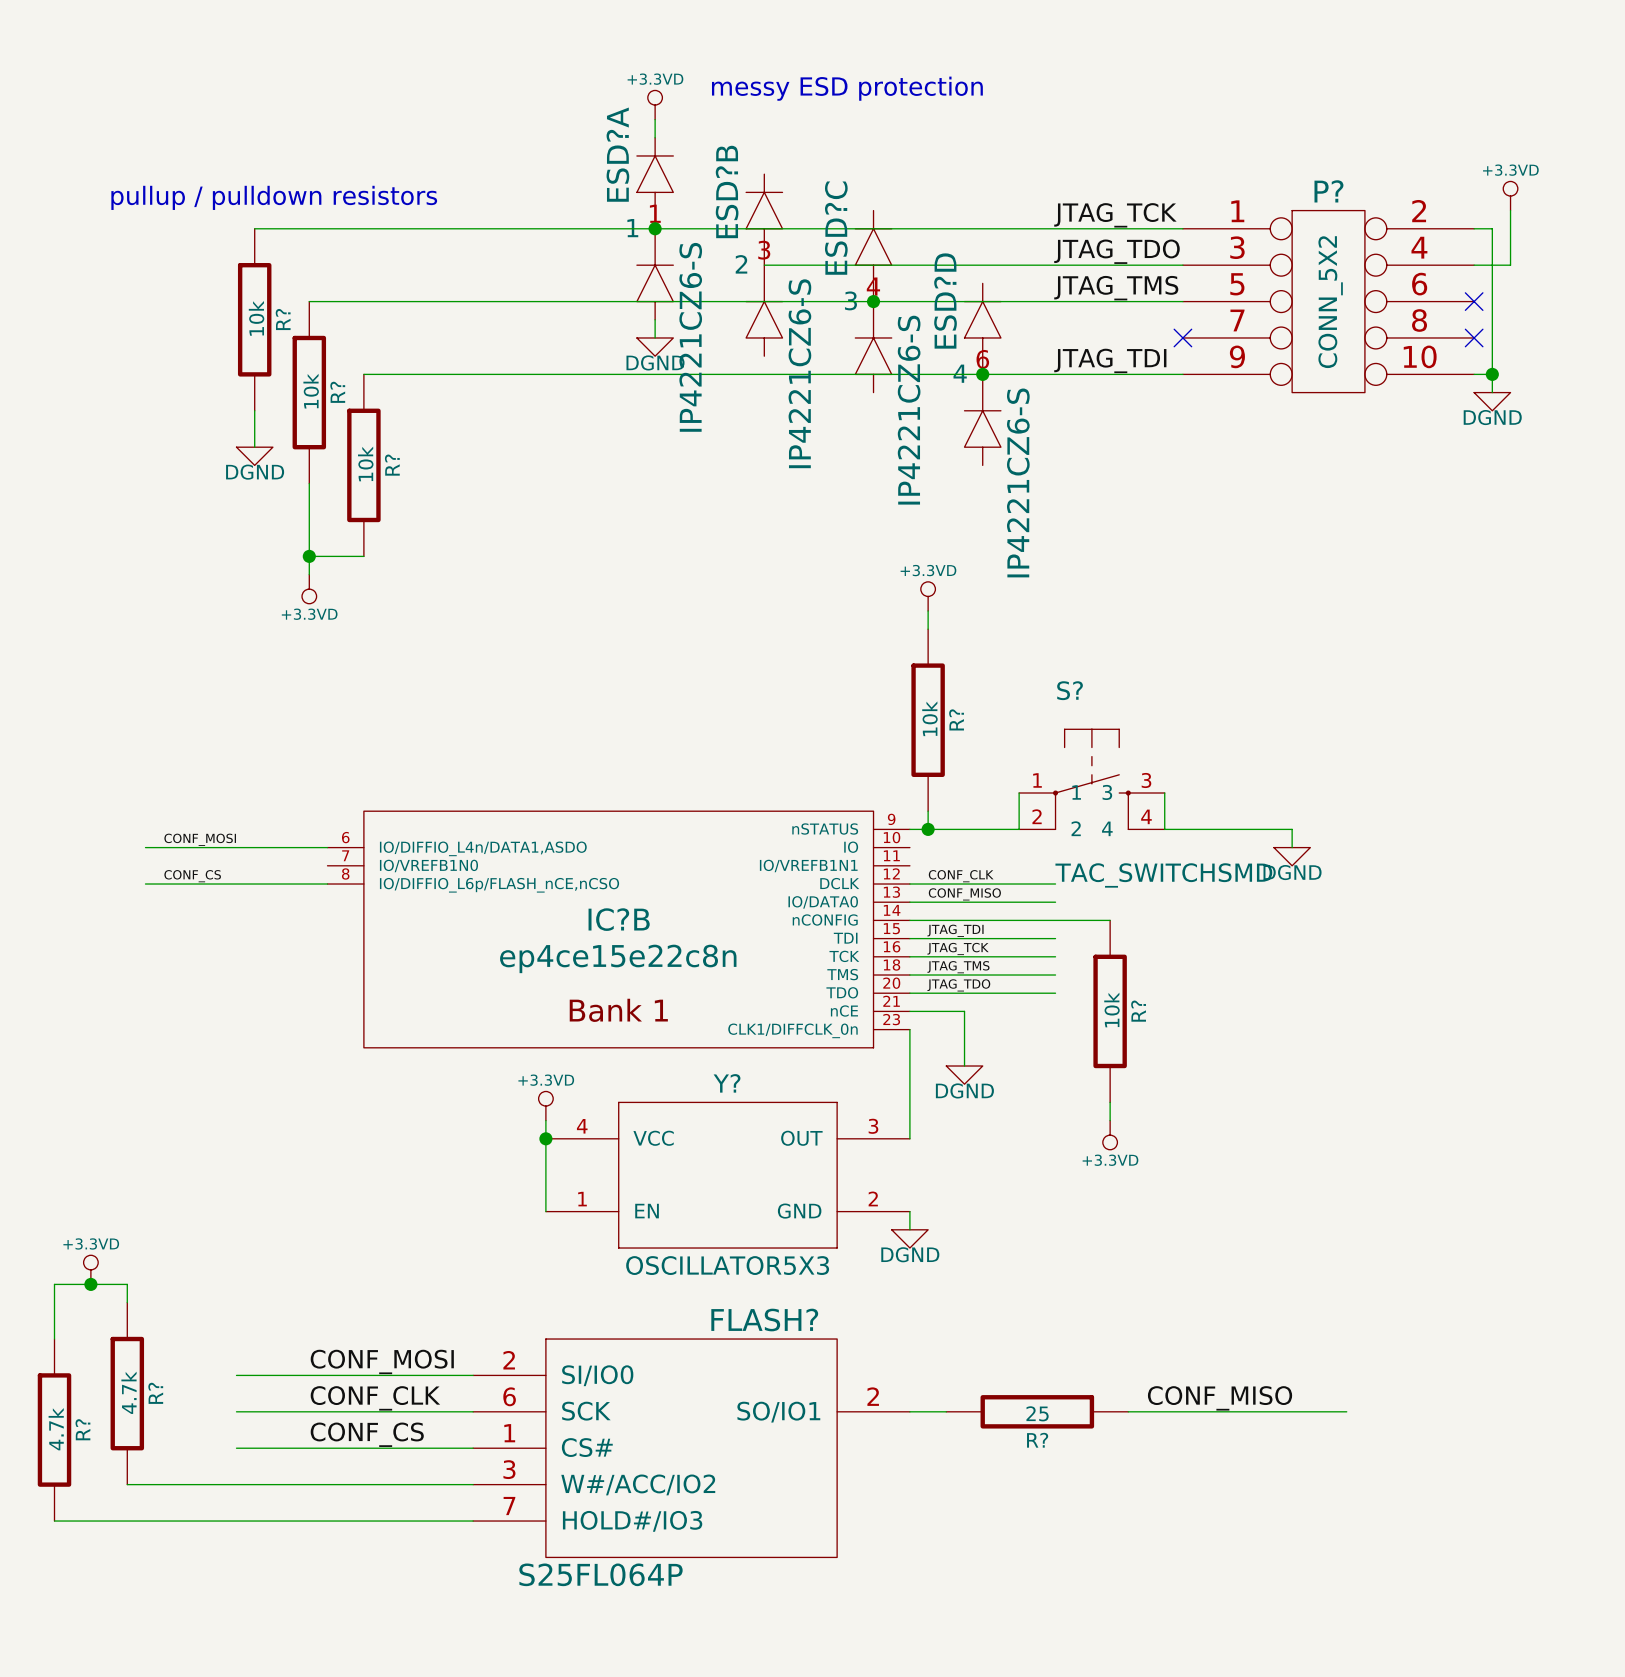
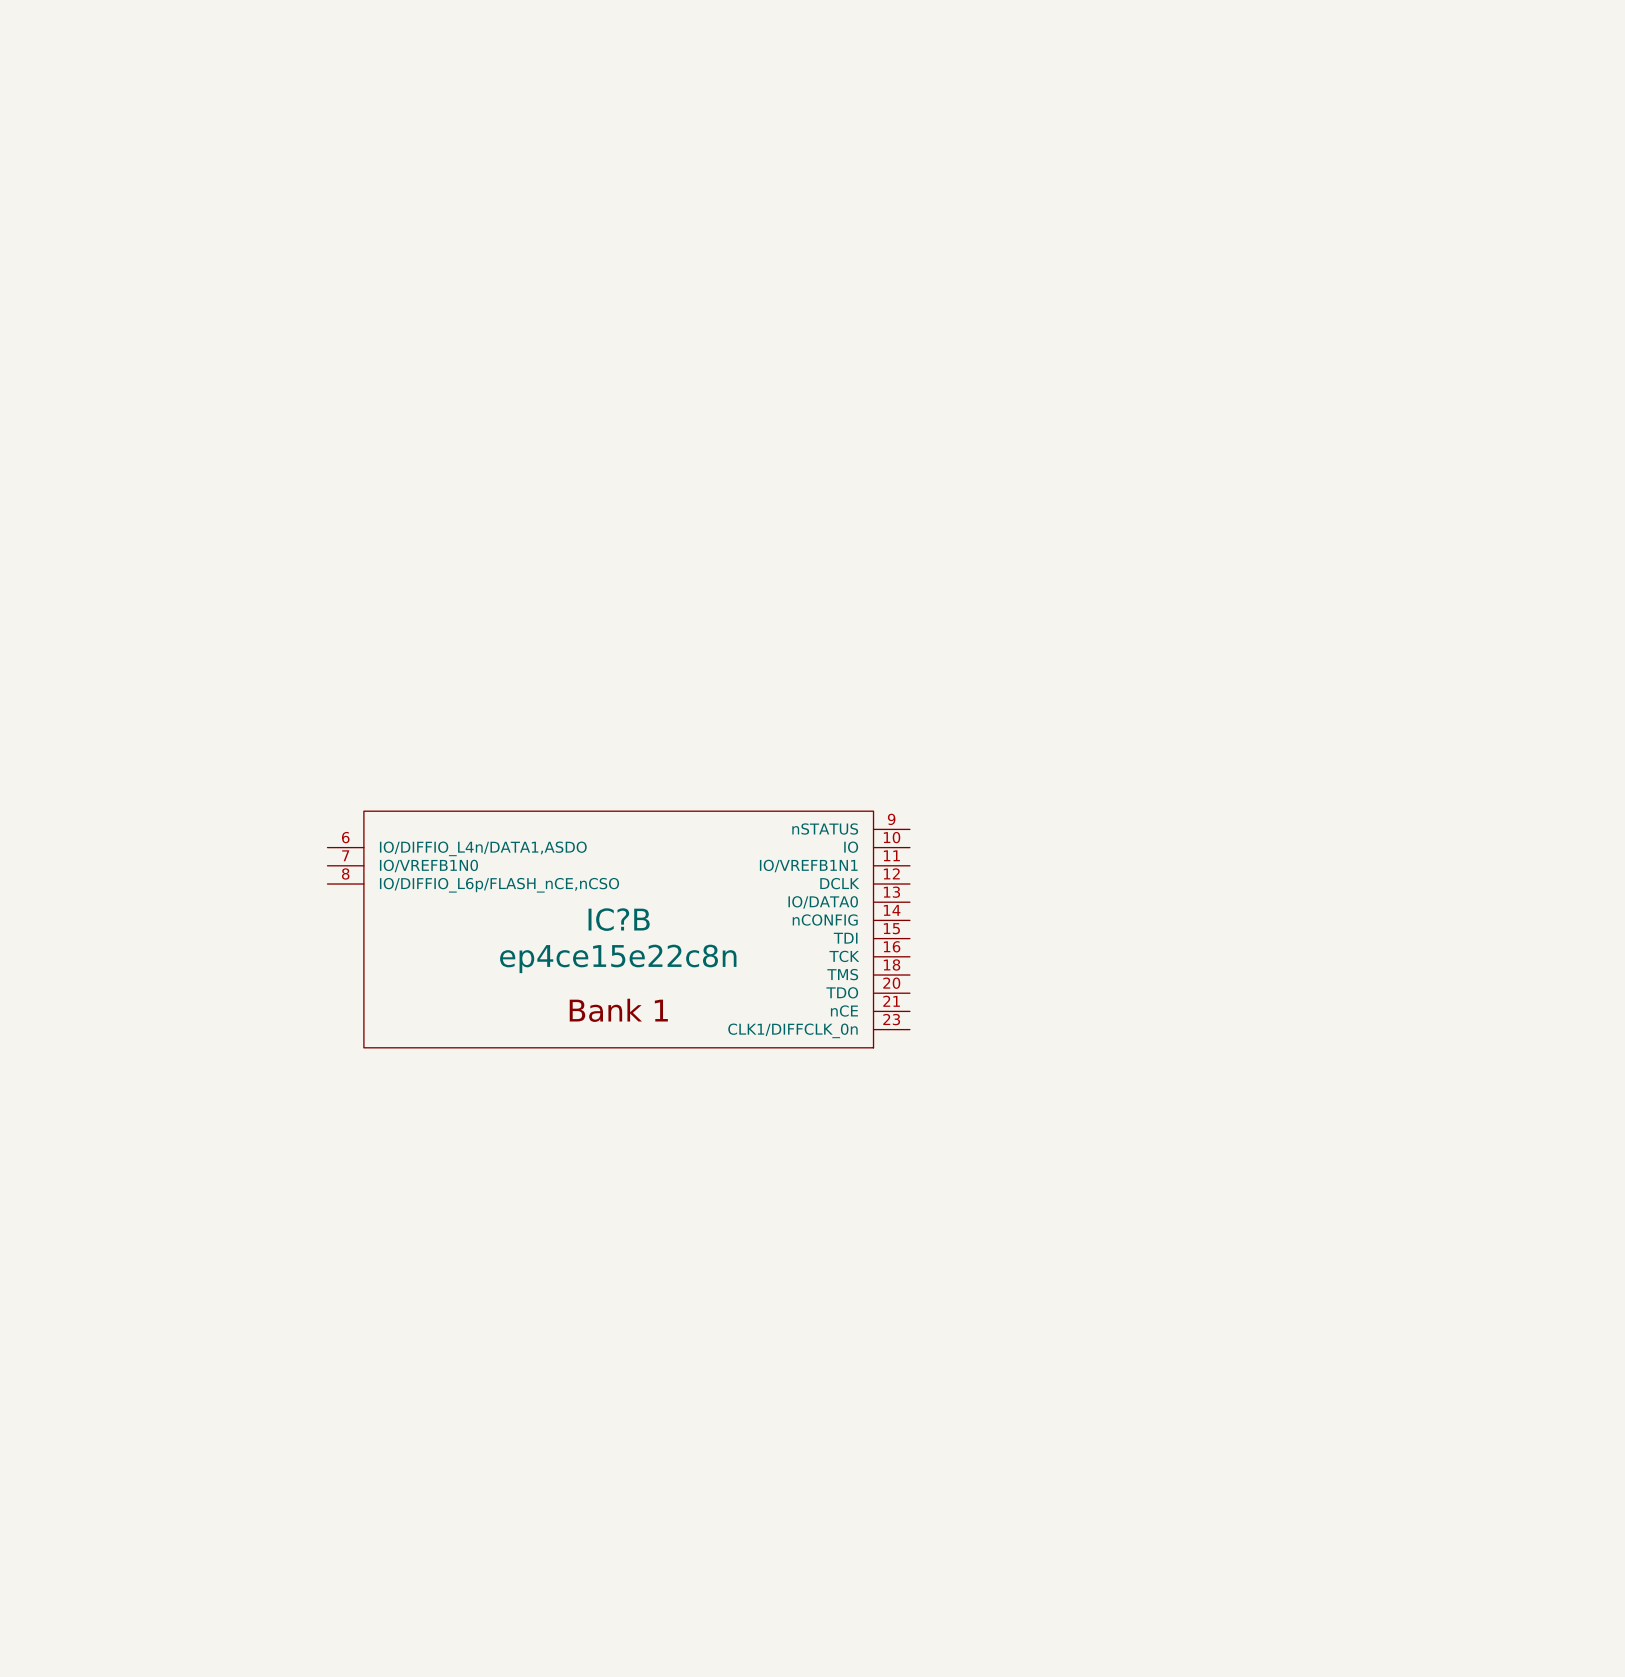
text: messy ESD protection (847, 88) -> none
power symbol: +3.3VD (655, 105) -> none
wire: (655, 119) (655, 137) -> none
power symbol: +3.3VD (1510, 196) -> none
text: pullup / pulldown resistors (274, 197) -> none
wire: (1510, 210) (1510, 265) (1474, 265) -> none
label: JTAG_TCK (1115, 215) -> none
wire: (254, 228) (1182, 228) -> none
ESD?A: IP4221CZ6-S (655, 228) -> none
junction: (655, 228) -> none
wire: (1474, 228) (1492, 228) (1492, 392) -> none
label: JTAG_TDO (1116, 251) -> none
wire: (764, 265) (1182, 265) -> none
ESD?B: IP4221CZ6-S (764, 265) -> none
label: JTAG_TMS (1116, 288) -> none
wire: (309, 301) (1182, 301) -> none
ESD?C: IP4221CZ6-S (873, 301) -> none
junction: (873, 301) -> none
P?: CONN_5X2 (1328, 301) -> none
no-connect mark: (1474, 301) -> none
R?: 10k (254, 319) -> none
wire: (655, 319) (655, 337) -> none
no-connect mark: (1182, 337) -> none
no-connect mark: (1474, 337) -> none
power symbol: DGND (655, 347) -> none
label: JTAG_TDI (1110, 360) -> none
wire: (363, 374) (1182, 374) -> none
ESD?D: IP4221CZ6-S (982, 374) -> none
junction: (982, 374) -> none
wire: (1474, 374) (1492, 374) -> none
junction: (1492, 374) -> none
R?: 10k (309, 392) -> none
power symbol: DGND (1492, 401) -> none
wire: (254, 410) (254, 447) -> none
power symbol: DGND (254, 456) -> none
R?: 10k (363, 465) -> none
wire: (309, 483) (309, 574) -> none
wire: (309, 556) (363, 556) -> none
junction: (309, 556) -> none
power symbol: +3.3VD (309, 589) -> none
power symbol: +3.3VD (928, 596) -> none
wire: (928, 610) (928, 629) -> none
R?: 10k (928, 720) -> none
S?: TAC_SWITCHSMD (1091, 779) -> none
wire: (1019, 793) (1019, 829) (909, 829) -> none
wire: (1164, 793) (1164, 829) (1292, 829) (1292, 847) -> none
wire: (928, 811) (928, 829) -> none
junction: (928, 829) -> none
label: CONF_MOSI (200, 839) -> none
wire: (145, 847) (327, 847) -> none
power symbol: DGND (1292, 856) -> none
label: CONF_CS (192, 876) -> none
label: CONF_CLK (961, 876) -> none
wire: (145, 884) (327, 884) -> none
wire: (909, 884) (1055, 884) -> none
label: CONF_MISO (964, 894) -> none
wire: (909, 902) (1055, 902) -> none
wire: (909, 920) (1110, 920) -> none
label: JTAG_TDI (955, 930) -> none
wire: (909, 938) (1055, 938) -> none
label: JTAG_TCK (958, 948) -> none
wire: (909, 956) (1055, 956) -> none
label: JTAG_TMS (958, 967) -> none
wire: (909, 975) (1055, 975) -> none
label: JTAG_TDO (958, 985) -> none
wire: (909, 993) (1055, 993) -> none
wire: (909, 1011) (964, 1011) (964, 1066) -> none
R?: 10k (1110, 1011) -> none
wire: (909, 1029) (909, 1138) -> none
power symbol: DGND (964, 1075) -> none
wire: (1110, 1102) (1110, 1120) -> none
power symbol: +3.3VD (545, 1106) -> none
wire: (545, 1120) (545, 1211) -> none
power symbol: +3.3VD (1110, 1135) -> none
junction: (545, 1138) -> none
Y?: OSCILLATOR5X3 (727, 1175) -> none
wire: (909, 1211) (909, 1229) -> none
power symbol: DGND (909, 1238) -> none
power symbol: +3.3VD (90, 1269) -> none
junction: (90, 1284) -> none
wire: (127, 1302) (127, 1284) (54, 1284) (54, 1339) -> none
label: CONF_MOSI (382, 1361) -> none
wire: (236, 1375) (473, 1375) -> none
R?: 4.7k (127, 1393) -> none
label: CONF_CLK (375, 1398) -> none
label: CONF_MISO (1220, 1398) -> none
wire: (236, 1411) (473, 1411) -> none
wire: (909, 1411) (946, 1411) -> none
R?: 25 (1037, 1411) -> none
wire: (1128, 1411) (1346, 1411) -> none
R?: 4.7k (54, 1430) -> none
label: CONF_CS (367, 1434) -> none
wire: (236, 1448) (473, 1448) -> none
FLASH?: S25FL064P (691, 1448) -> none
wire: (127, 1484) (473, 1484) -> none
wire: (54, 1521) (473, 1521) -> none

